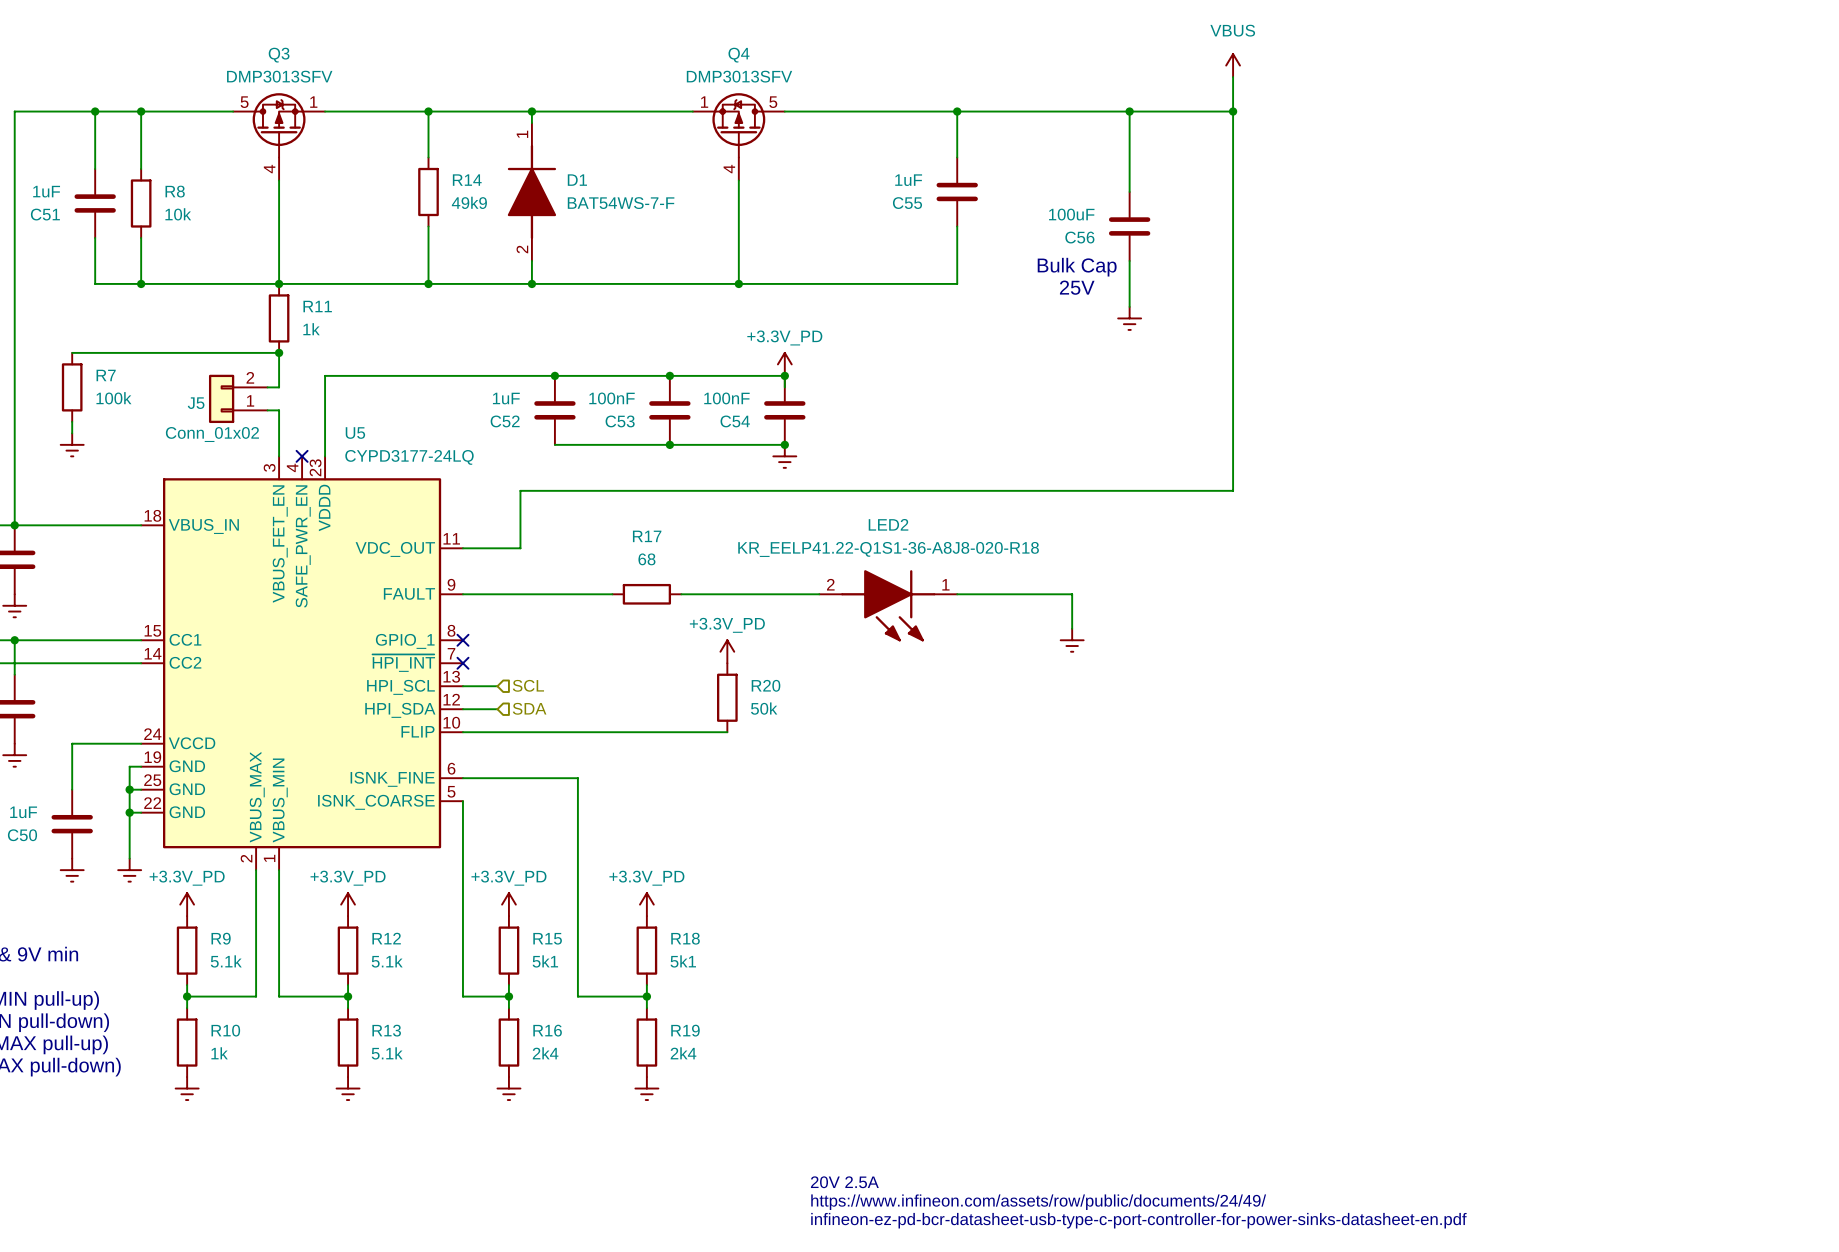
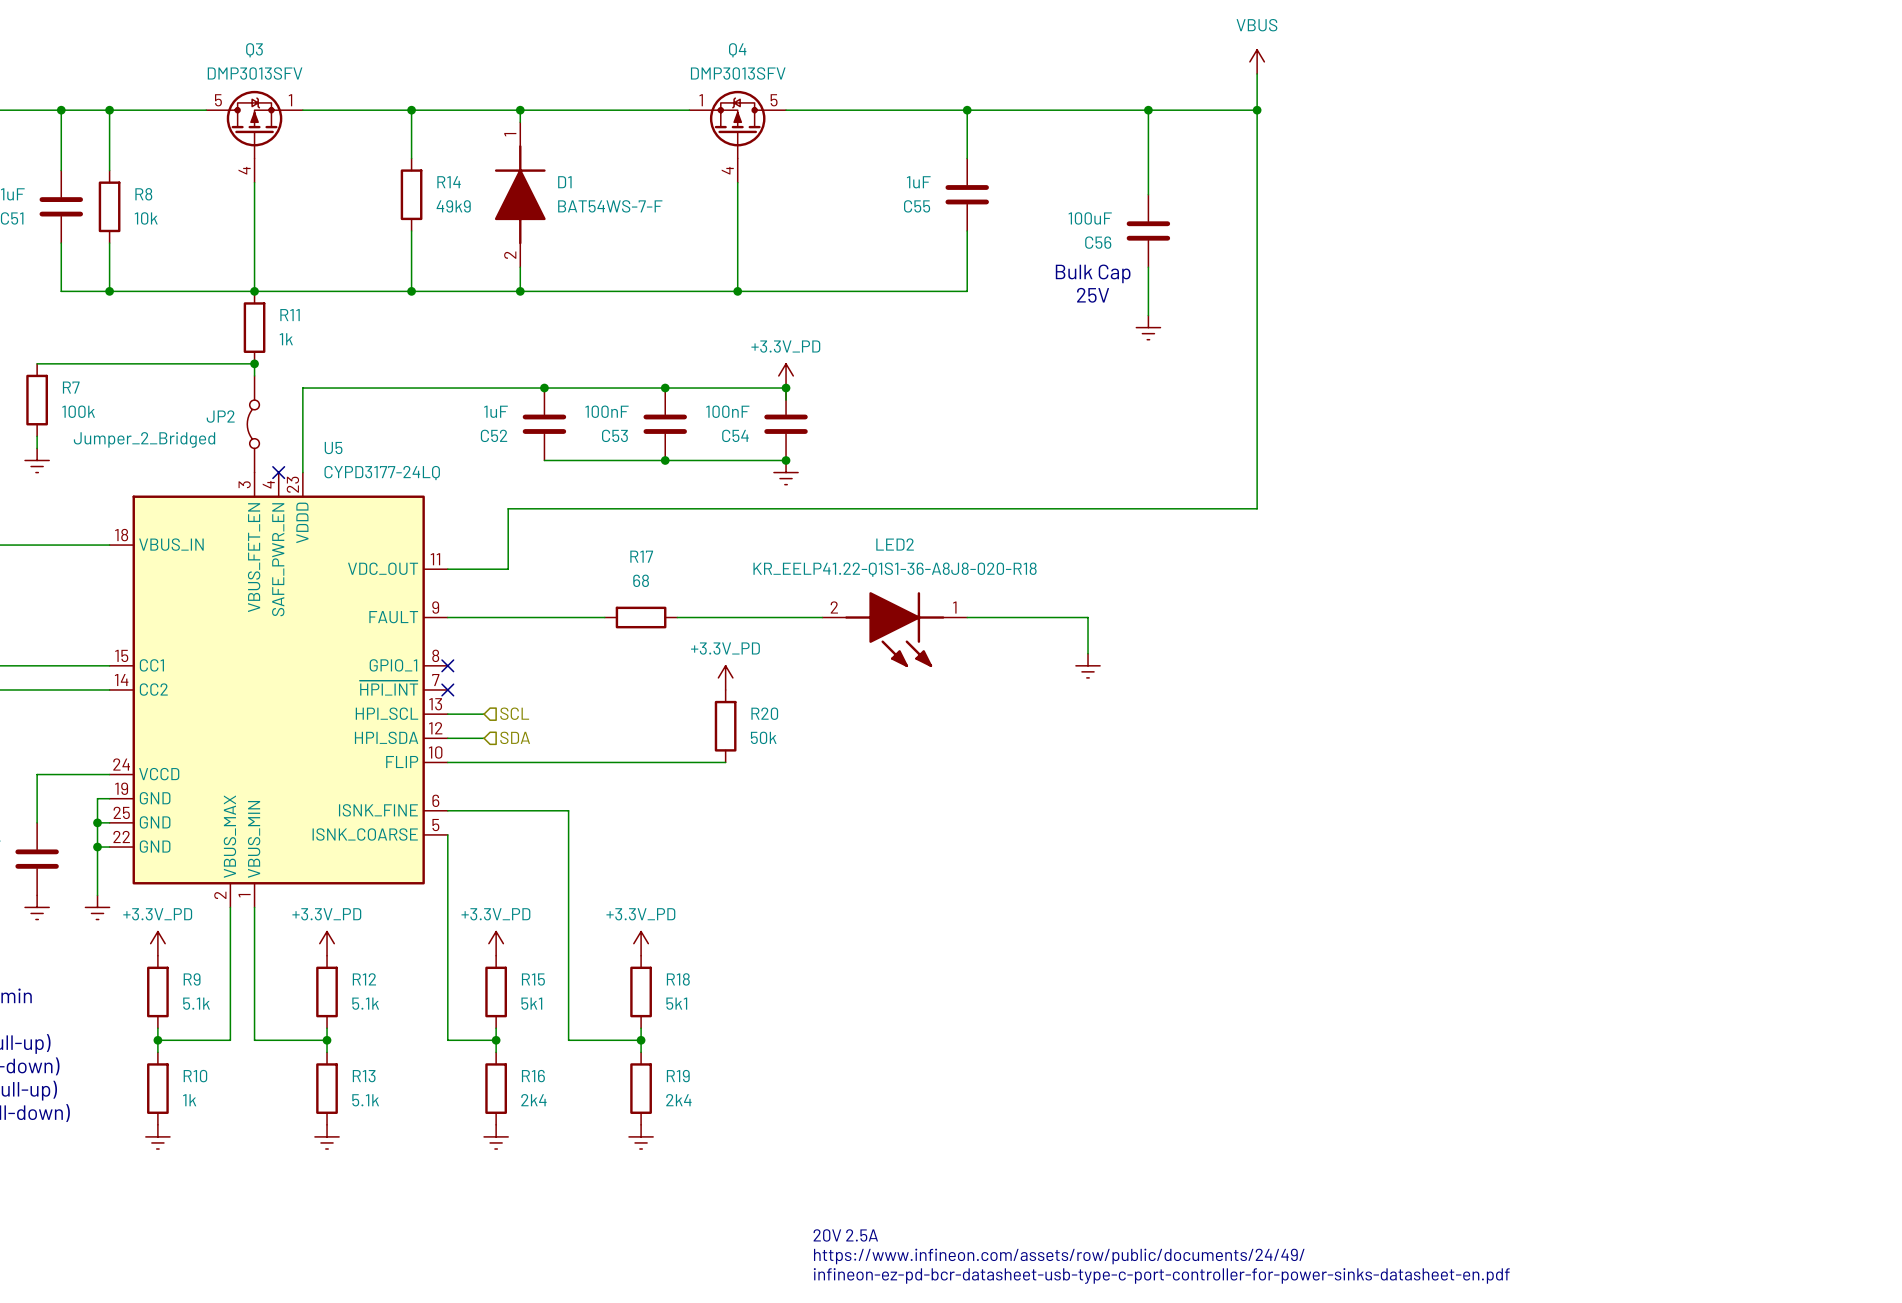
J5: Conn_01x02 (238, 398) -> none
wire: (267, 410) (279, 410) (279, 456) -> none
JP2: none -> Jumper_2_Bridged (253, 424)

